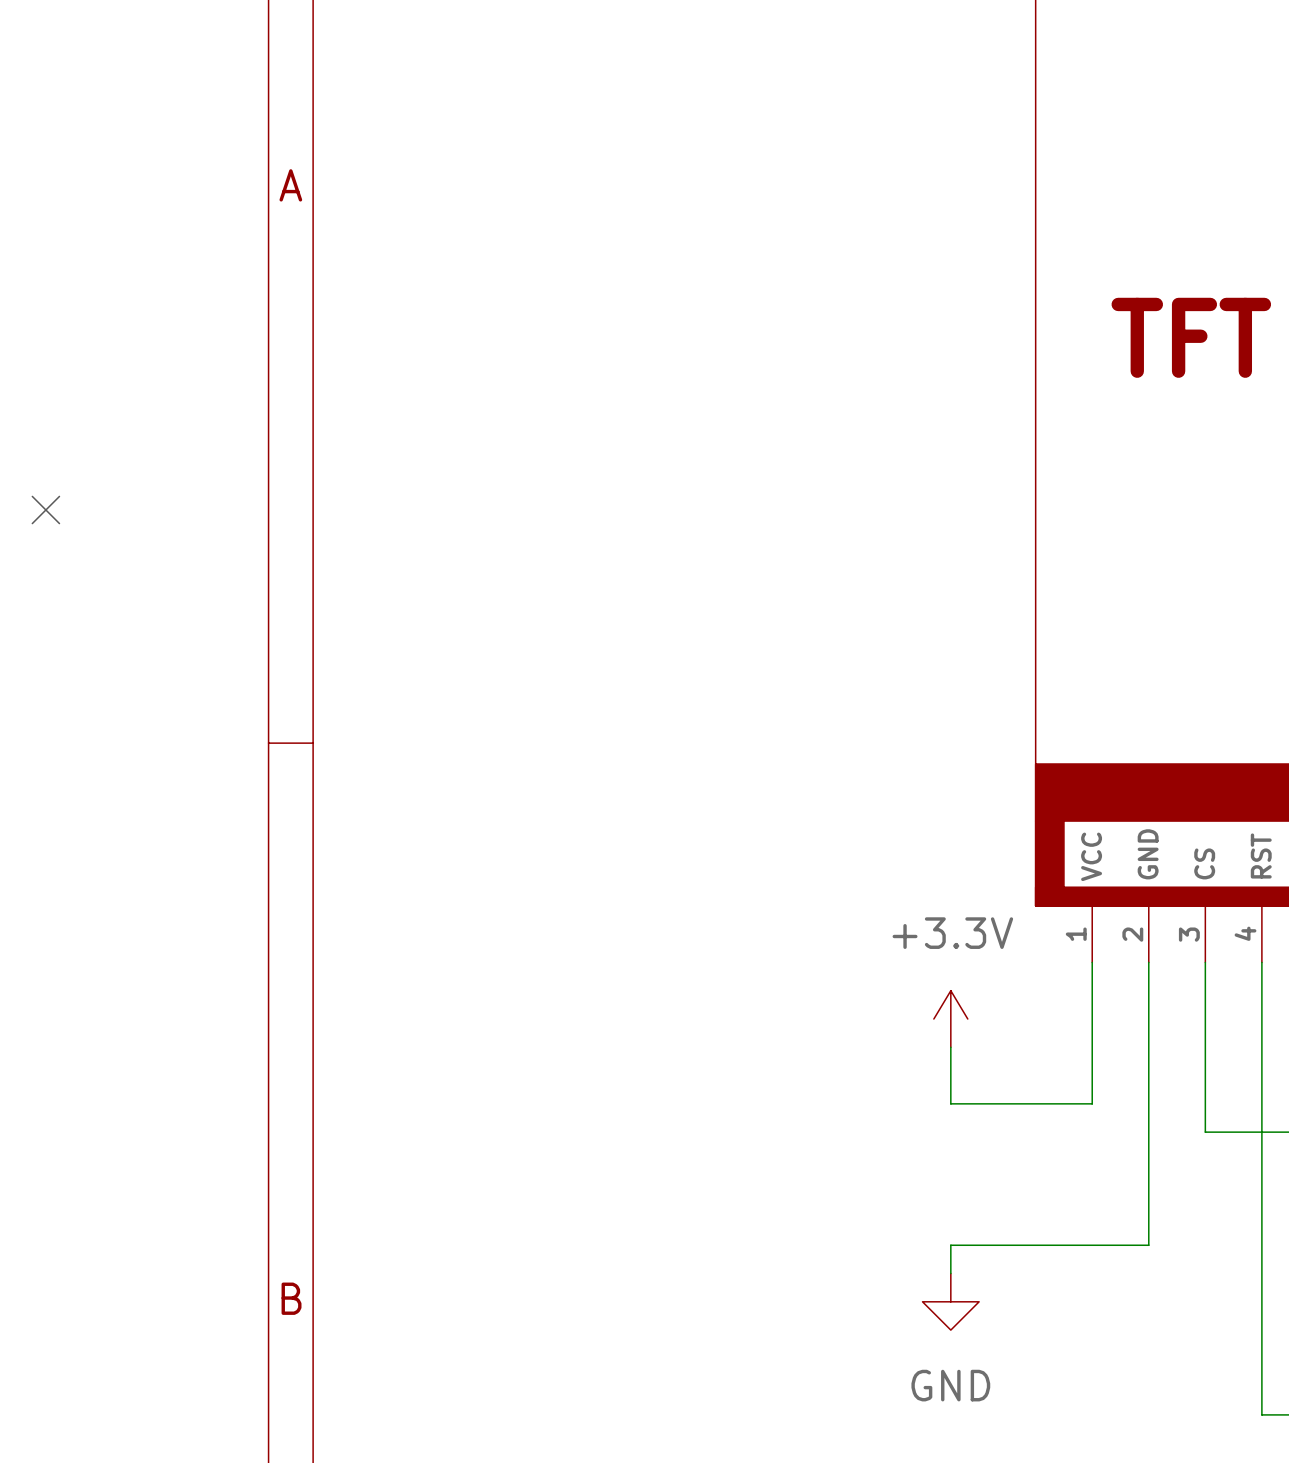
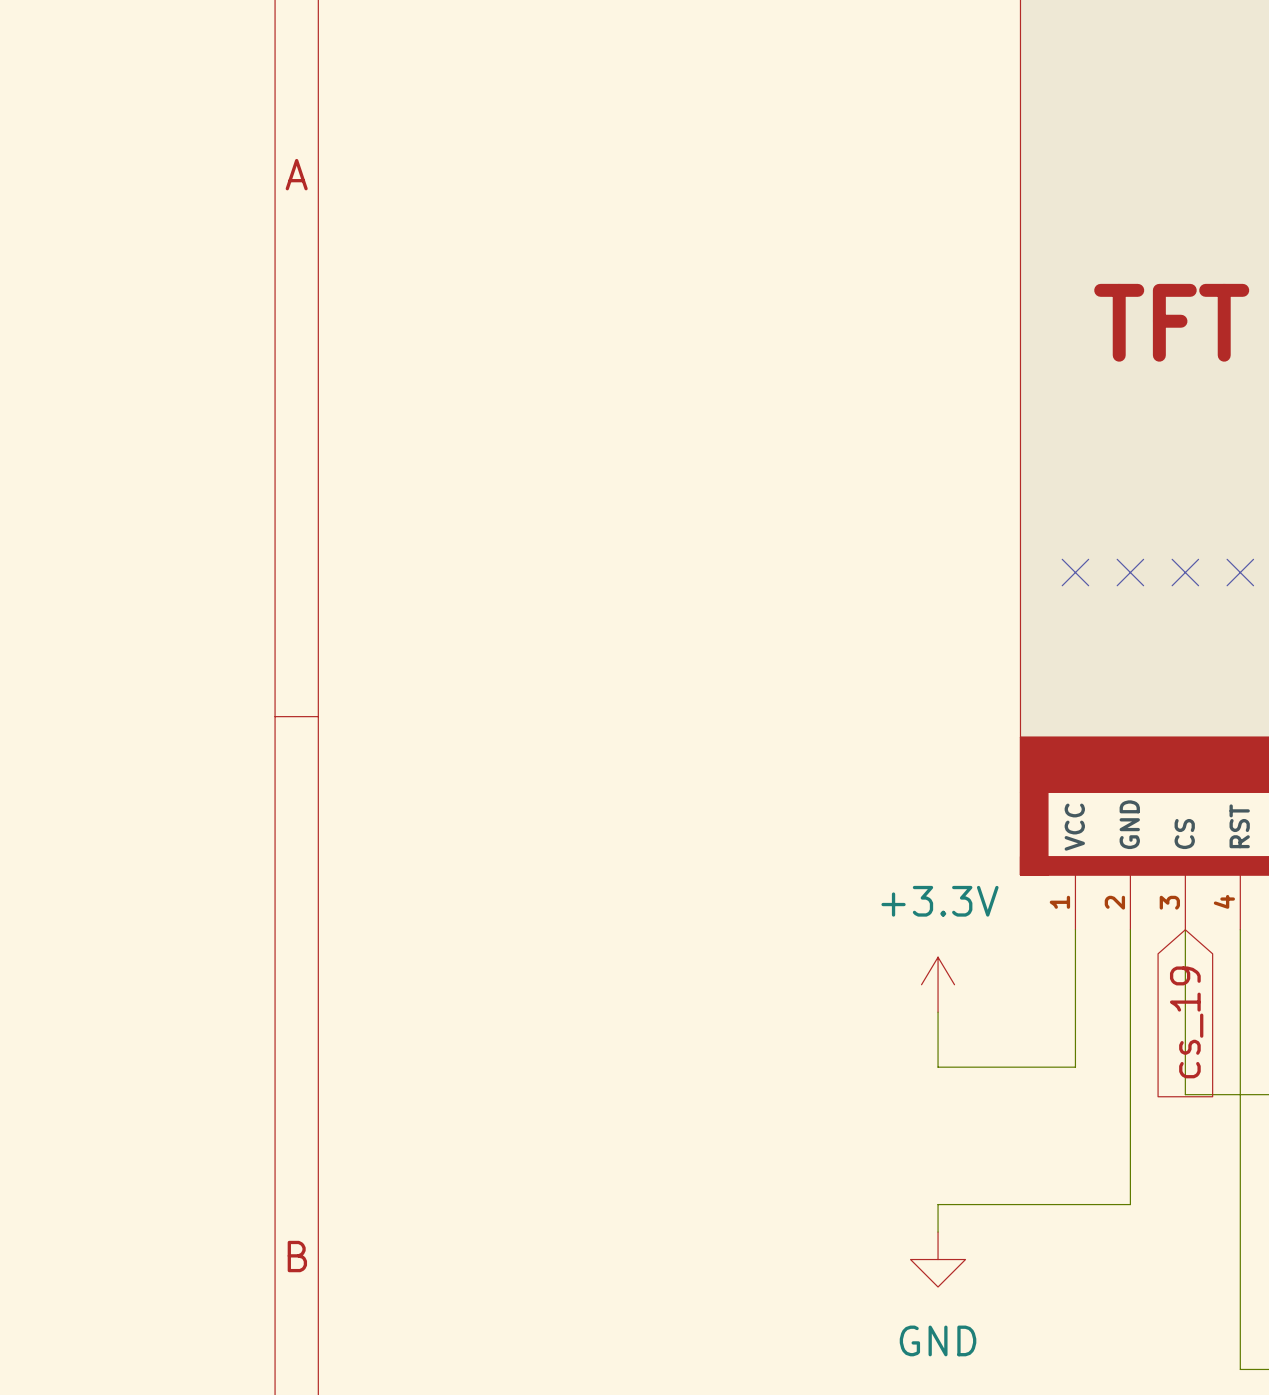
no-connect mark: (45, 509) -> none
no-connect mark: none -> (1075, 572)
no-connect mark: none -> (1130, 572)
no-connect mark: none -> (1185, 572)
no-connect mark: none -> (1240, 572)
global label: none -> cs_19 (1186, 1022)

